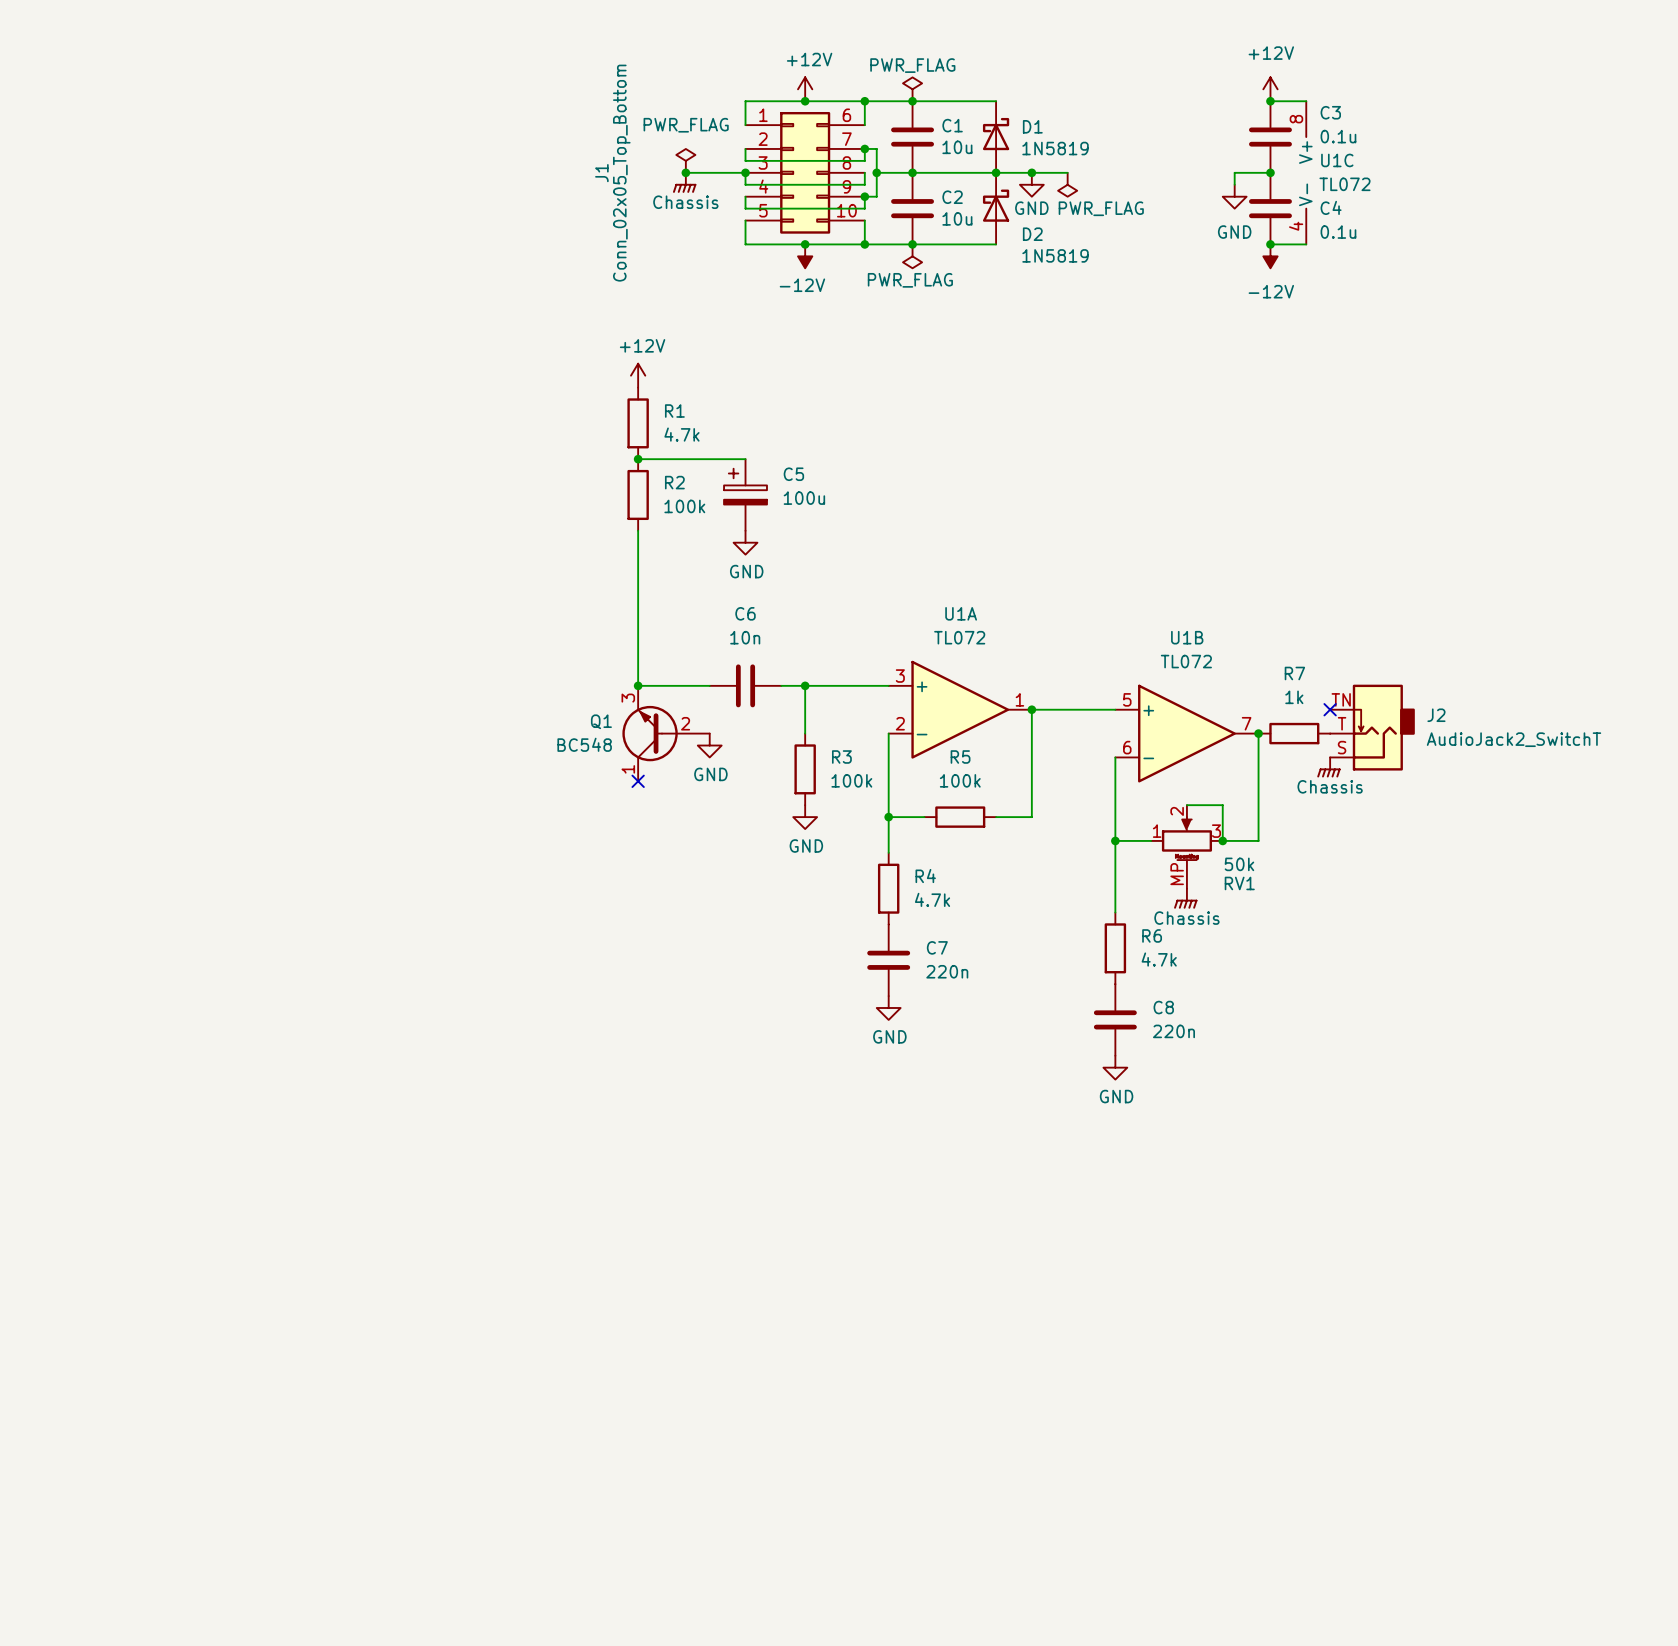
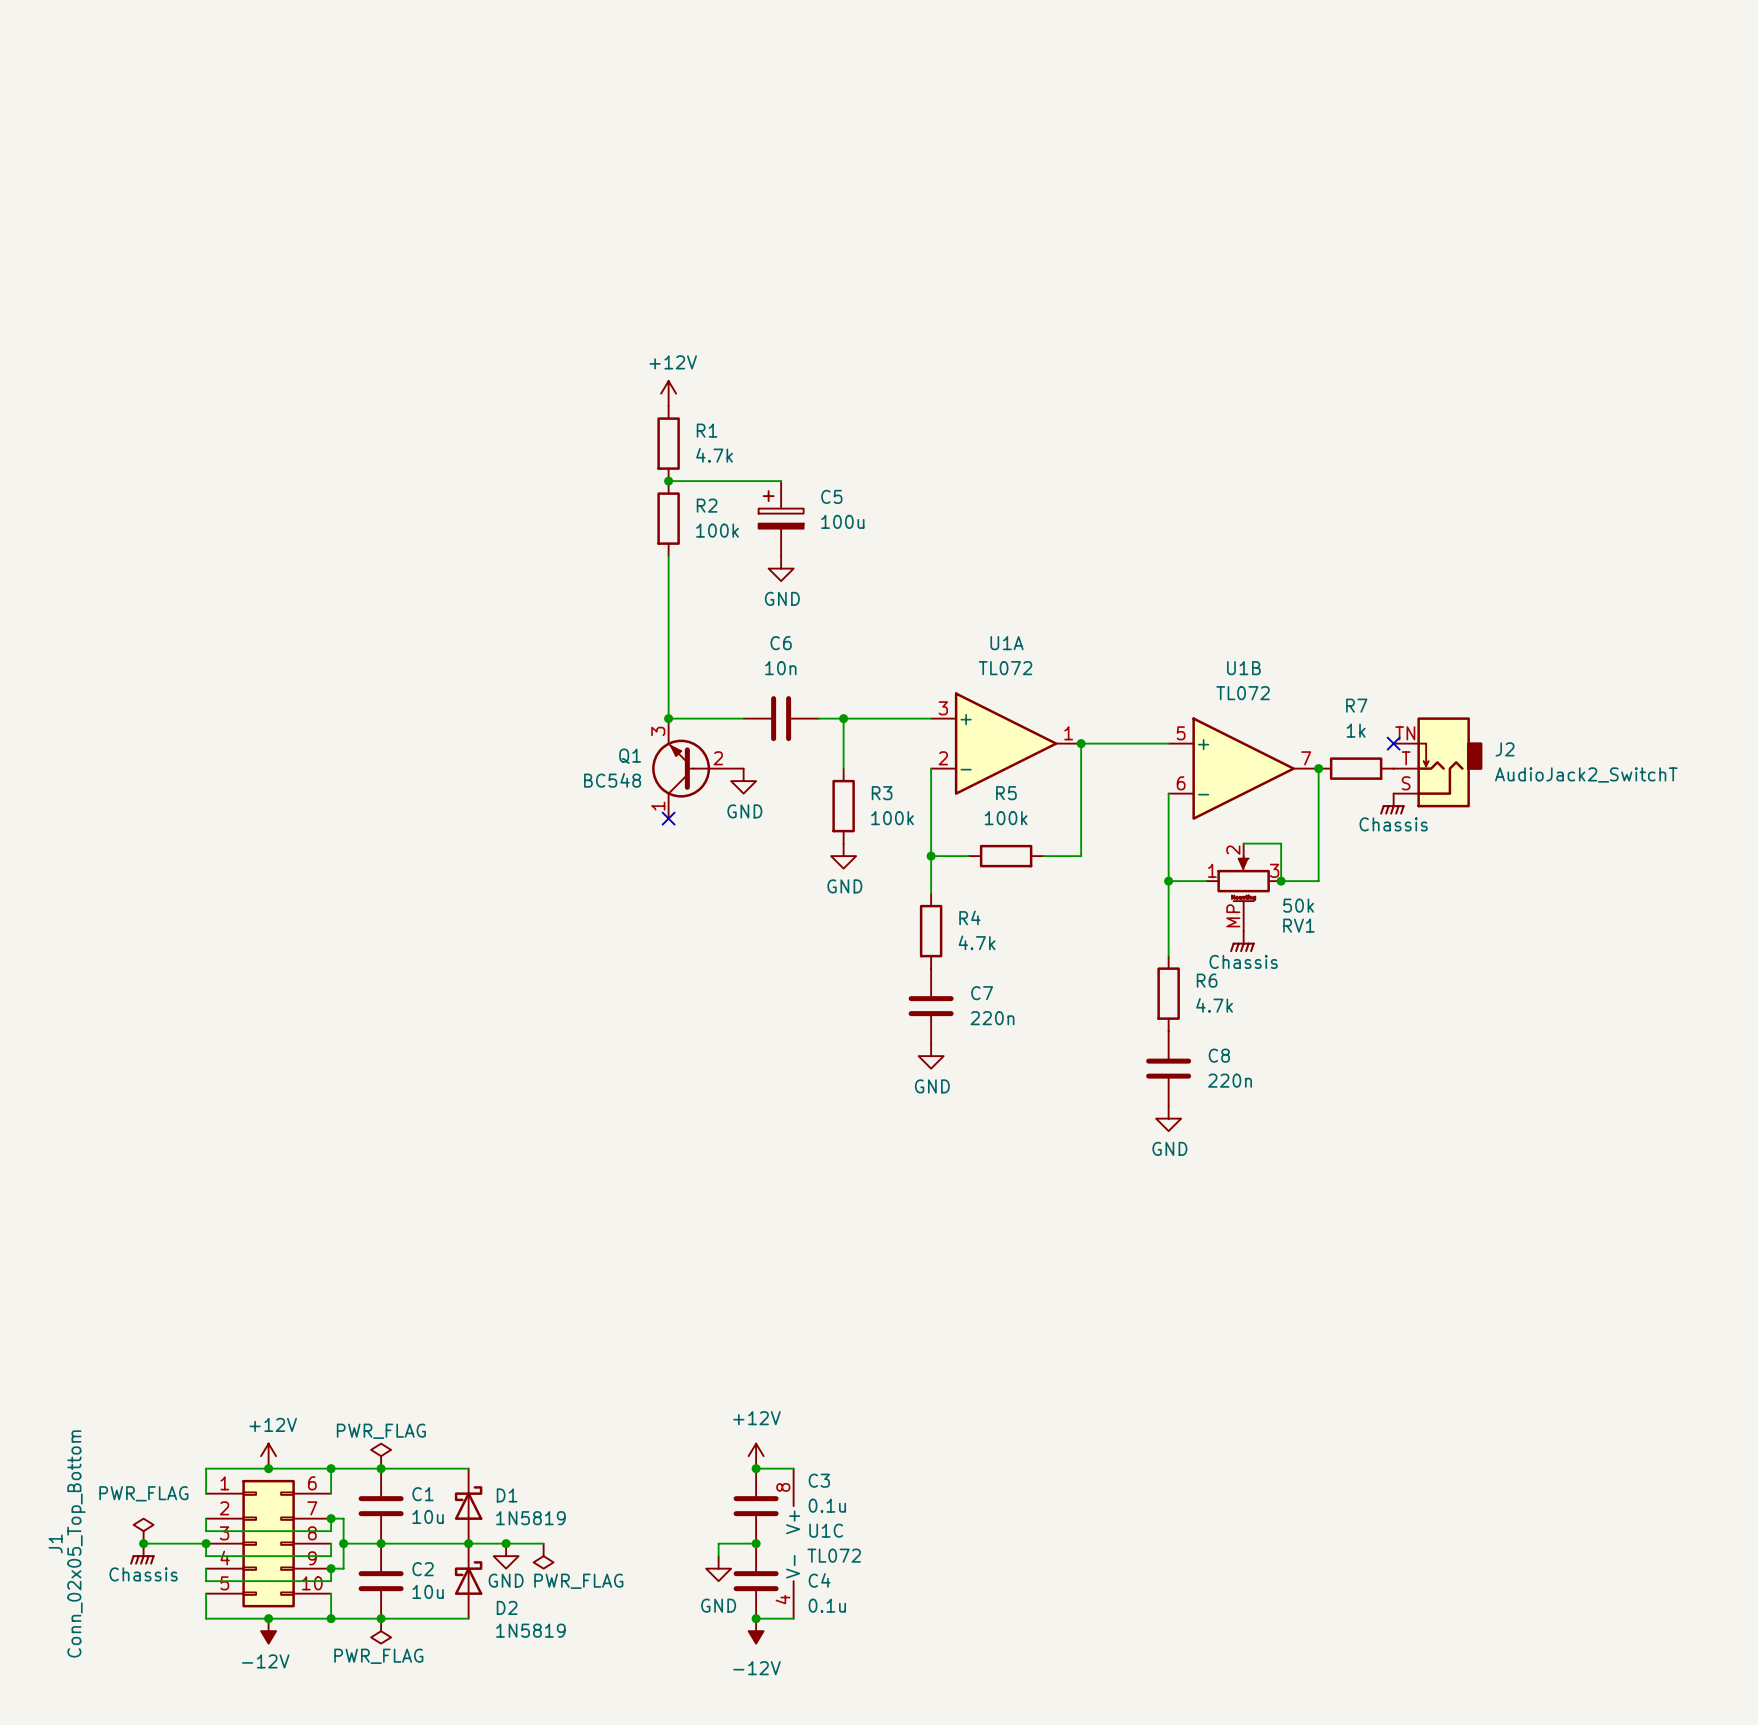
power symbol: +12V (805, 89) -> none
power symbol: PWR_FLAG (912, 89) -> none
power symbol: +12V (1270, 89) -> none
junction: (805, 101) -> none
wire: (864, 101) (864, 125) -> none
junction: (864, 101) -> none
junction: (912, 101) -> none
wire: (996, 101) (745, 101) (745, 125) -> none
wire: (1270, 101) (1306, 101) -> none
junction: (1270, 101) -> none
C1 position: (912, 137) -> (381, 1506)
D1 position: (996, 137) -> (468, 1506)
C3 position: (1270, 137) -> (756, 1506)
wire: (745, 148) (745, 160) (864, 160) (864, 148) (876, 148) (876, 196) (864, 196) (864, 208) (745, 208) (745, 196) -> none
junction: (864, 148) -> none
power symbol: PWR_FLAG (685, 160) -> none
wire: (685, 172) (745, 172) (745, 184) (864, 184) (864, 172) -> none
junction: (685, 172) -> none
junction: (745, 172) -> none
J1 position: (805, 172) -> (268, 1543)
wire: (876, 172) (1067, 172) -> none
junction: (876, 172) -> none
junction: (912, 172) -> none
junction: (996, 172) -> none
junction: (1031, 172) -> none
wire: (1270, 172) (1234, 172) (1234, 184) -> none
junction: (1270, 172) -> none
U1C position: (1306, 172) -> (793, 1543)
power symbol: Chassis (684, 182) -> none
power symbol: GND (1031, 184) -> none
power symbol: PWR_FLAG (1067, 184) -> none
junction: (864, 196) -> none
power symbol: GND (1234, 196) -> none
C2 position: (912, 208) -> (381, 1581)
D2 position: (996, 208) -> (468, 1581)
C4 position: (1270, 208) -> (756, 1581)
wire: (745, 220) (745, 244) (996, 244) -> none
wire: (864, 220) (864, 244) -> none
junction: (805, 244) -> none
junction: (864, 244) -> none
junction: (912, 244) -> none
wire: (1270, 244) (1306, 244) -> none
junction: (1270, 244) -> none
power symbol: -12V (805, 256) -> none
power symbol: PWR_FLAG (912, 256) -> none
power symbol: -12V (1270, 256) -> none
power symbol: none -> +12V (268, 1456)
power symbol: none -> PWR_FLAG (381, 1456)
power symbol: none -> +12V (756, 1456)
junction: none -> (268, 1468)
wire: none -> (331, 1468) (331, 1493)
junction: none -> (331, 1468)
junction: none -> (381, 1468)
wire: none -> (468, 1468) (206, 1468) (206, 1493)
wire: none -> (756, 1468) (793, 1468)
junction: none -> (756, 1468)
wire: none -> (206, 1518) (206, 1531) (331, 1531) (331, 1518) (343, 1518) (343, 1568) (331, 1568) (331, 1581) (206, 1581) (206, 1568)
junction: none -> (331, 1518)
power symbol: none -> PWR_FLAG (143, 1531)
wire: none -> (143, 1543) (206, 1543) (206, 1556) (331, 1556) (331, 1543)
junction: none -> (143, 1543)
junction: none -> (206, 1543)
wire: none -> (343, 1543) (543, 1543)
junction: none -> (343, 1543)
junction: none -> (381, 1543)
junction: none -> (468, 1543)
junction: none -> (506, 1543)
wire: none -> (756, 1543) (718, 1543) (718, 1556)
junction: none -> (756, 1543)
power symbol: none -> Chassis (142, 1554)
power symbol: none -> GND (506, 1556)
power symbol: none -> PWR_FLAG (543, 1556)
junction: none -> (331, 1568)
power symbol: none -> GND (718, 1568)
wire: none -> (206, 1593) (206, 1618) (468, 1618)
wire: none -> (331, 1593) (331, 1618)
junction: none -> (268, 1618)
junction: none -> (331, 1618)
junction: none -> (381, 1618)
wire: none -> (756, 1618) (793, 1618)
junction: none -> (756, 1618)
power symbol: none -> -12V (268, 1631)
power symbol: none -> PWR_FLAG (381, 1631)
power symbol: none -> -12V (756, 1631)

